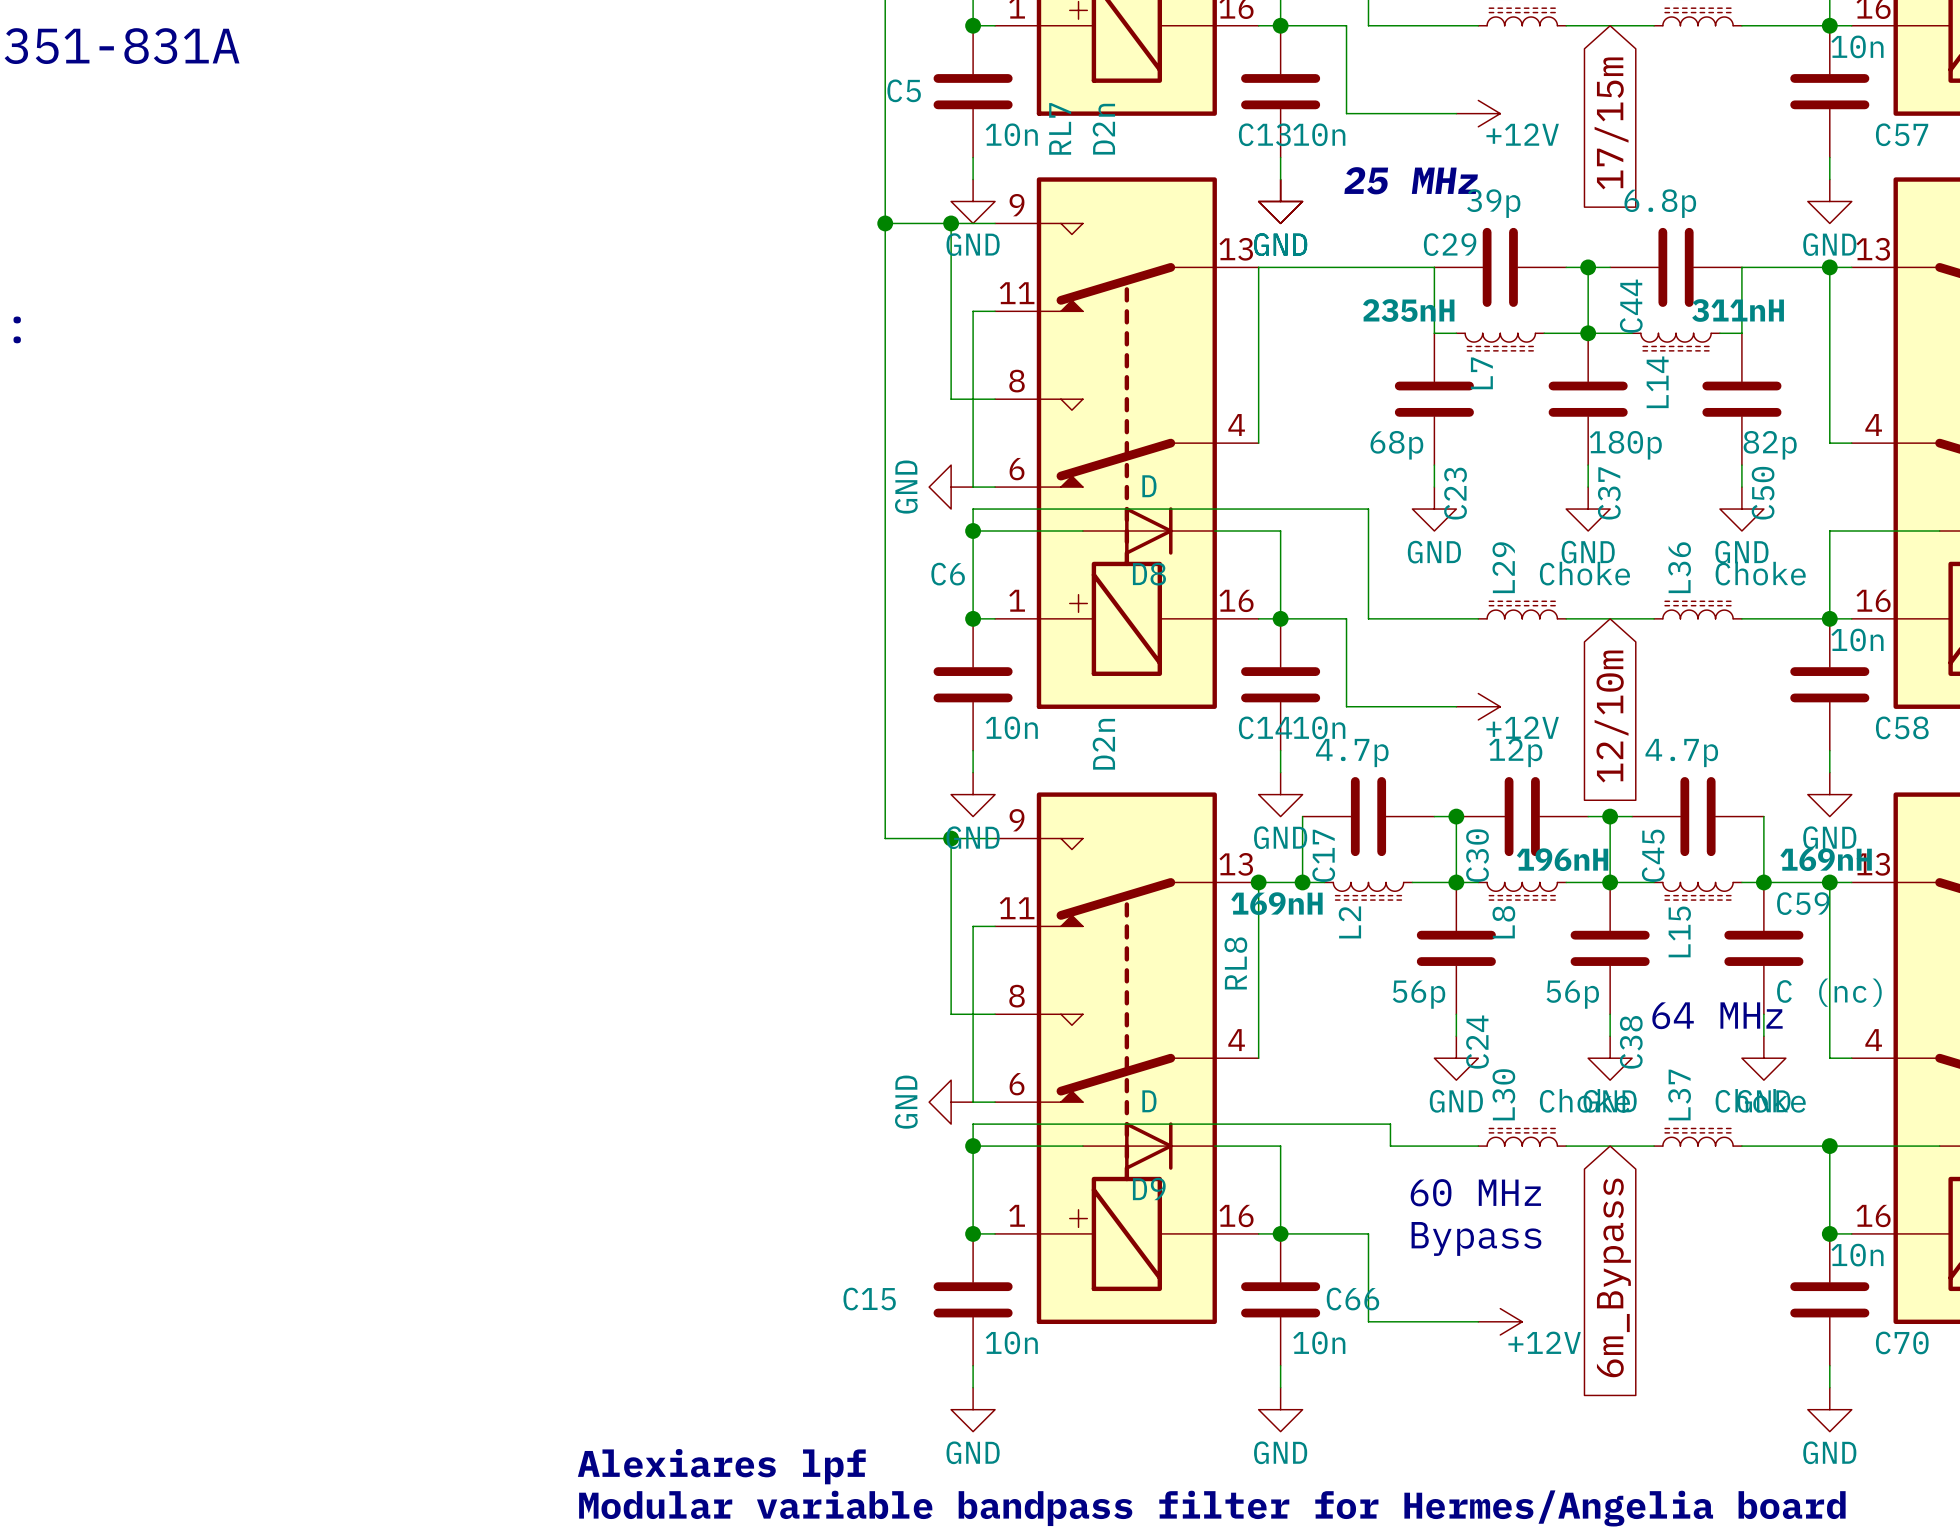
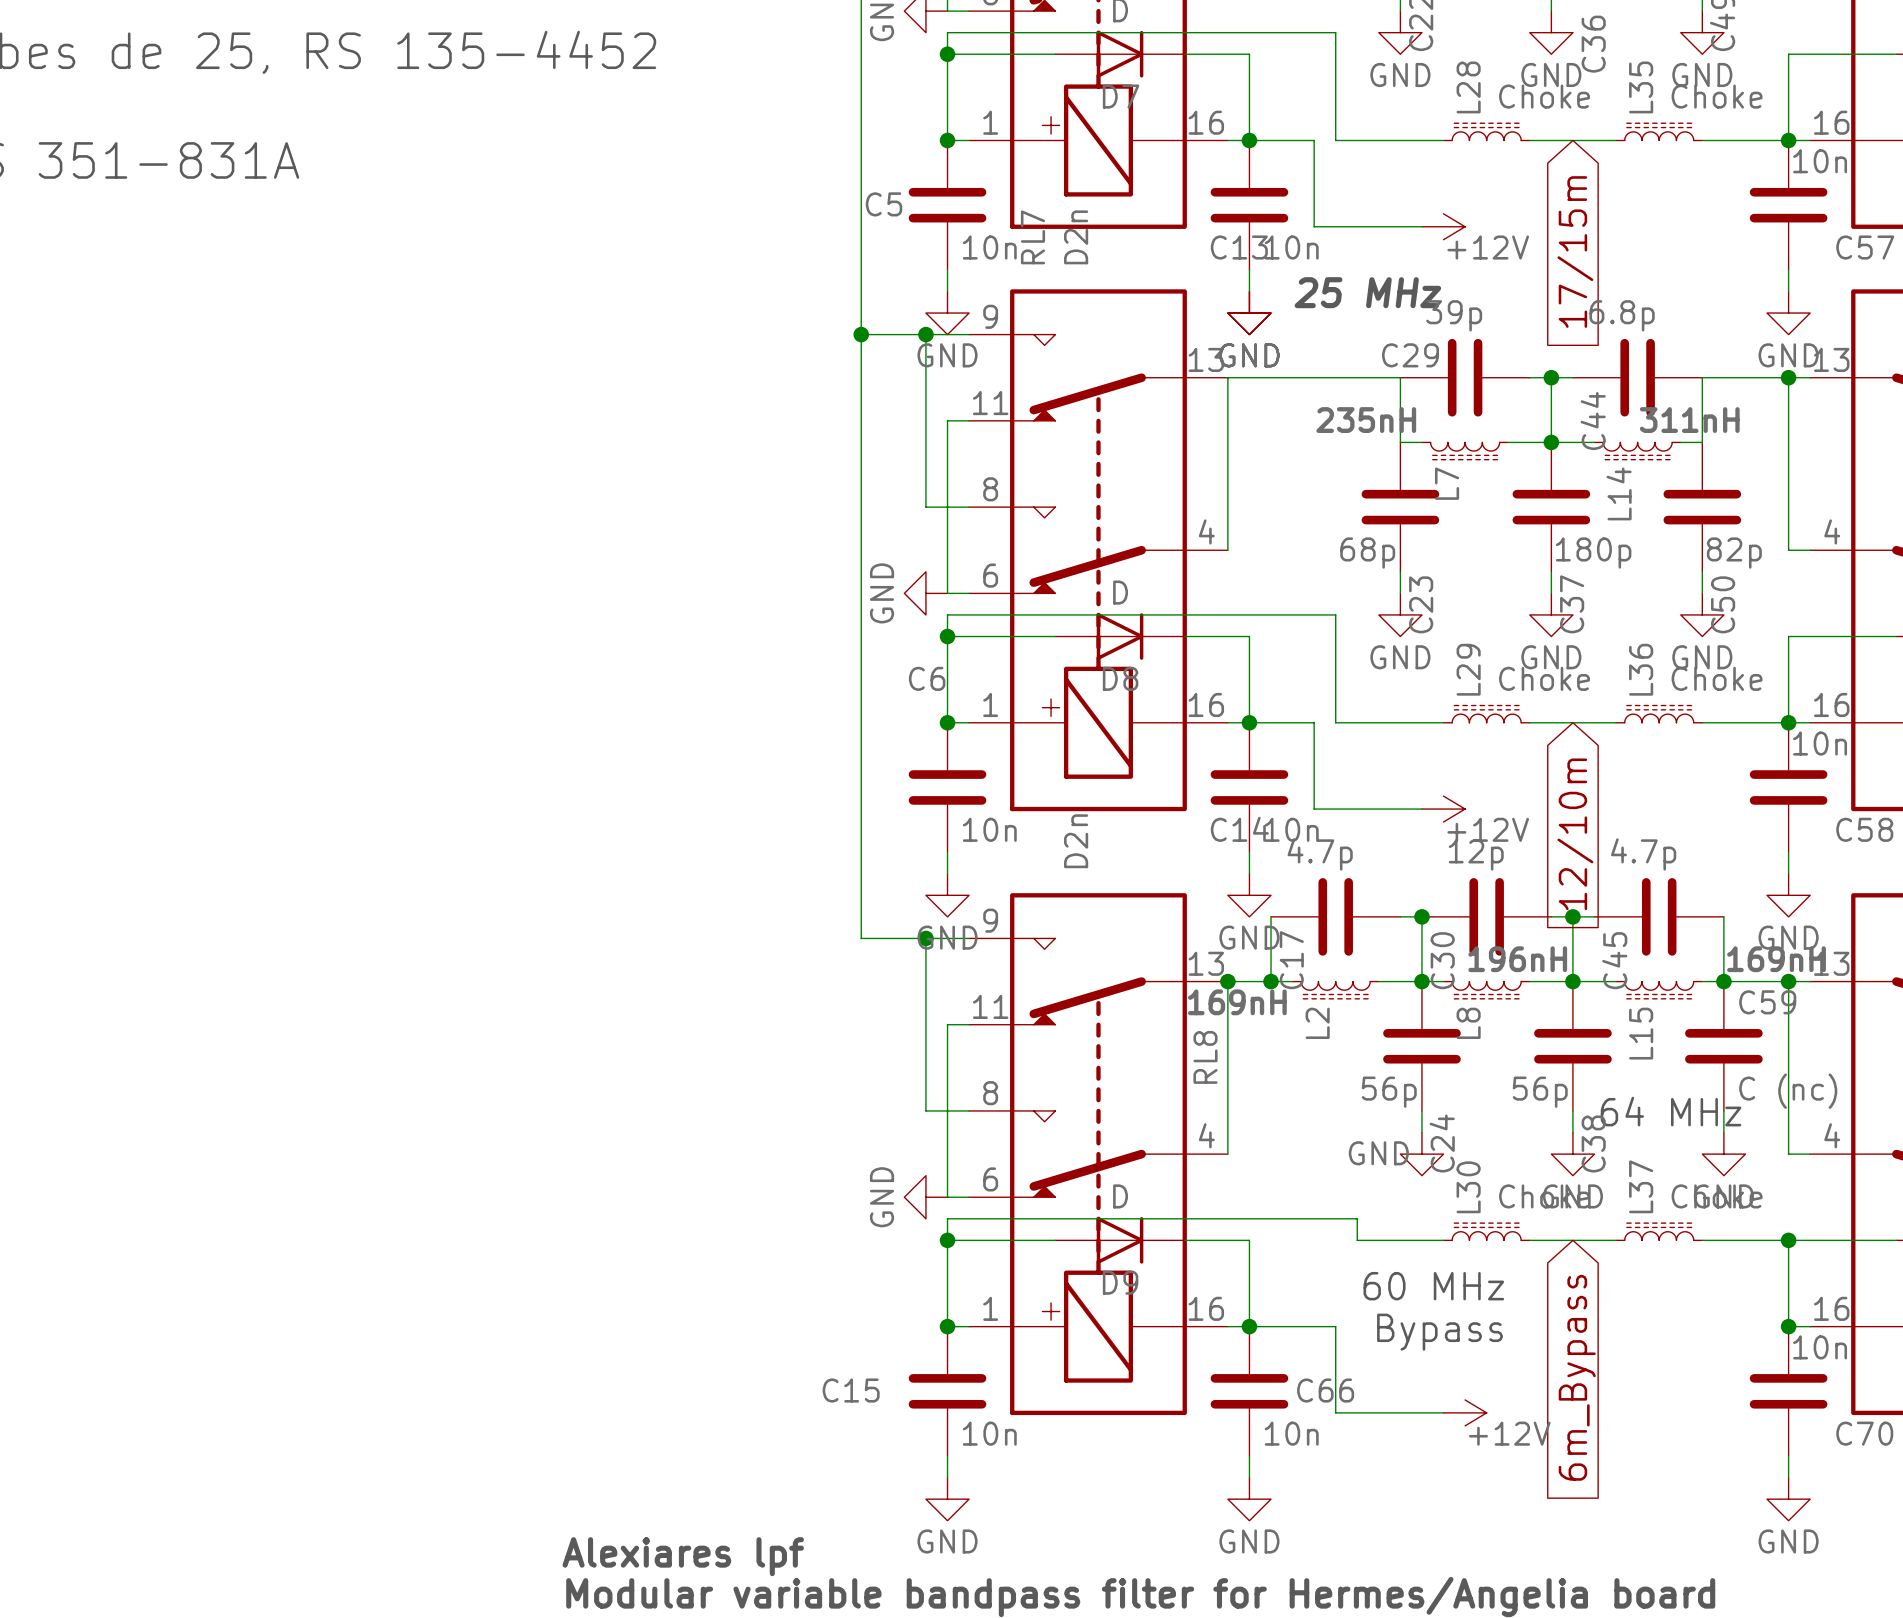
power symbol text position: GND (1456, 1101) -> GND (1378, 1153)

